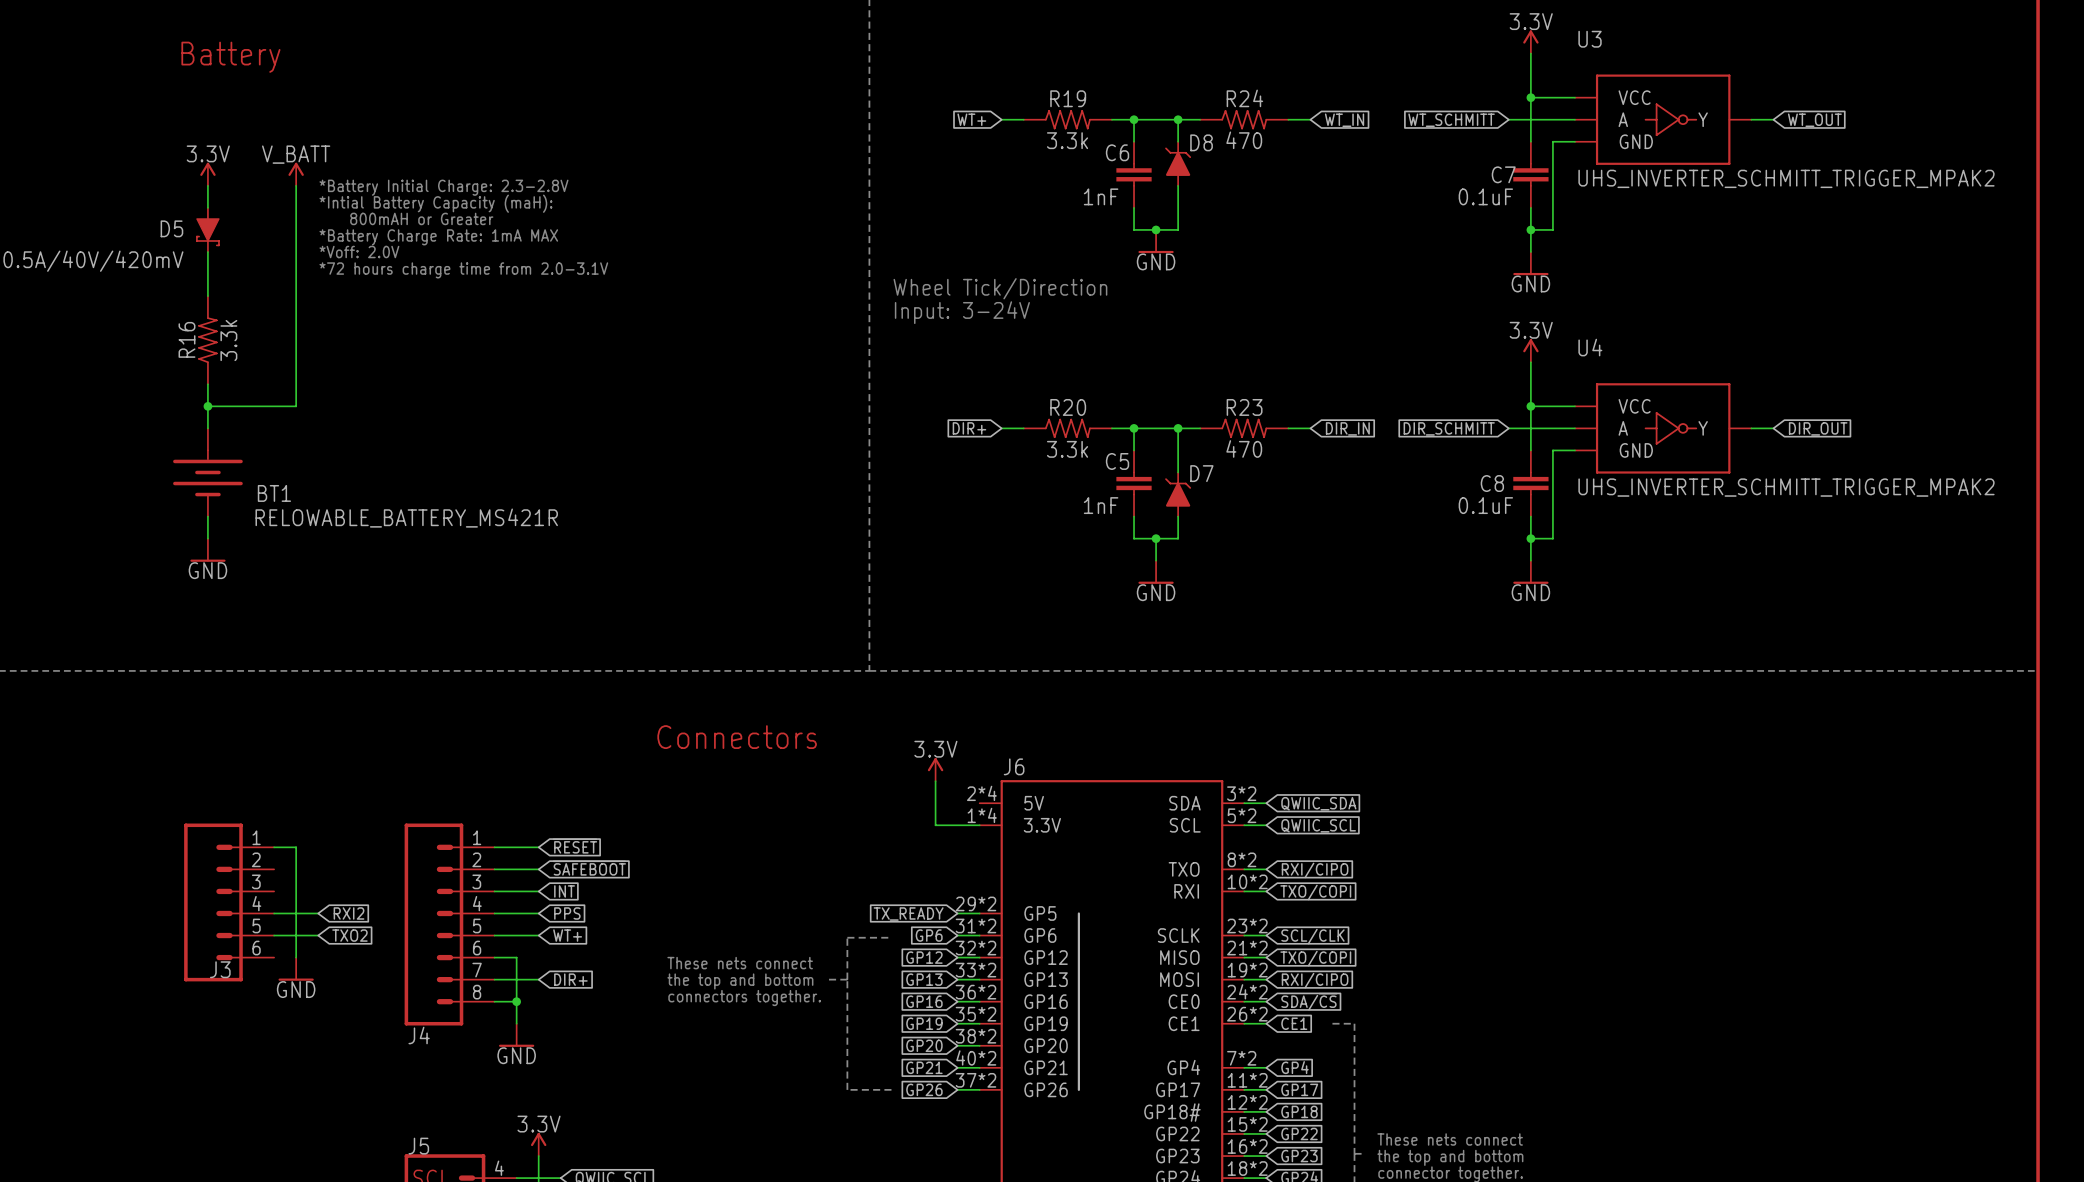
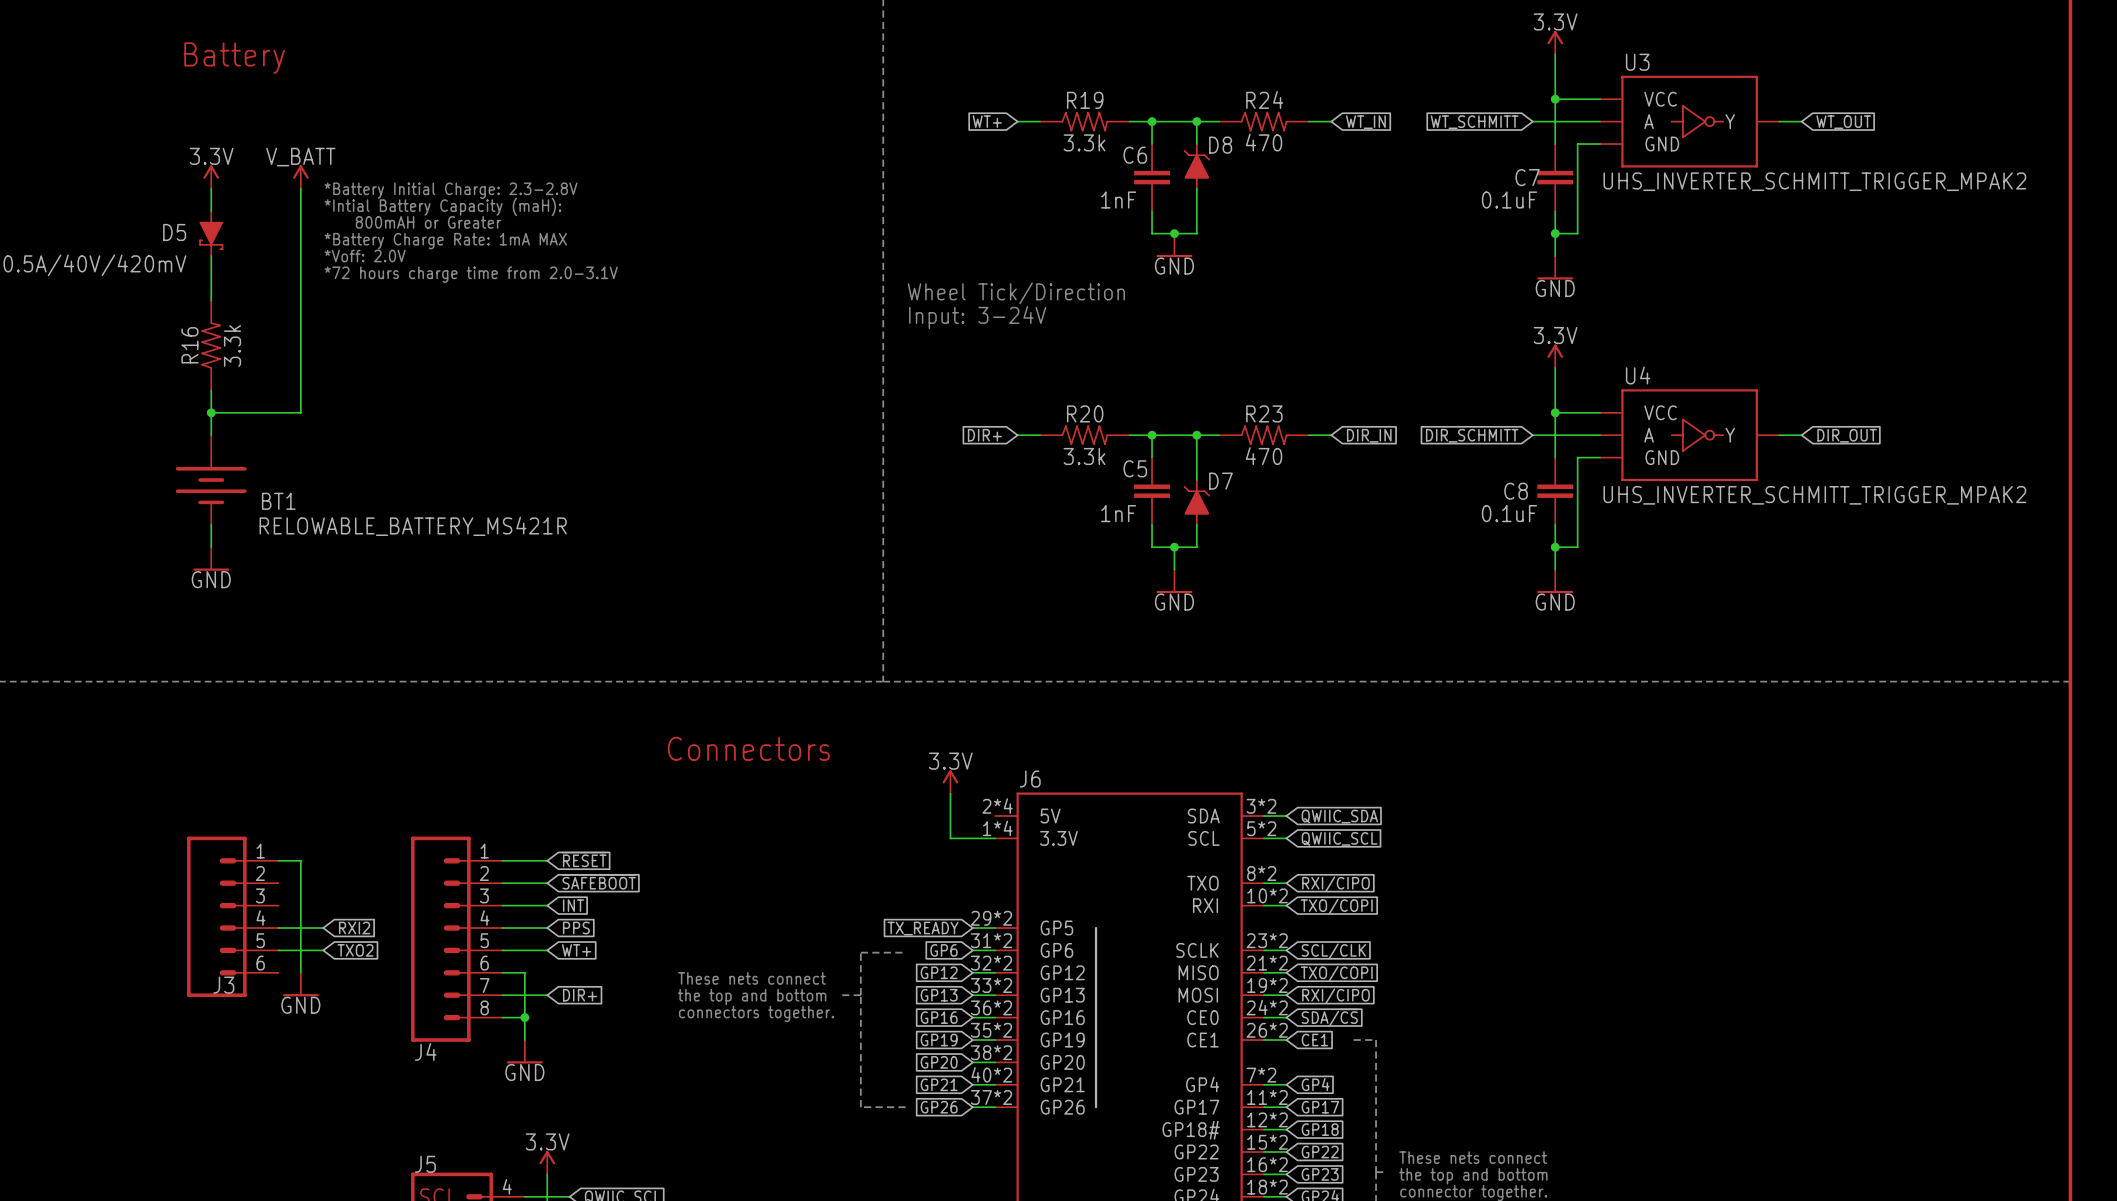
U3 name position: U3 (1590, 39) -> U3 (1637, 62)
U4 name position: U4 (1590, 347) -> U4 (1638, 375)

